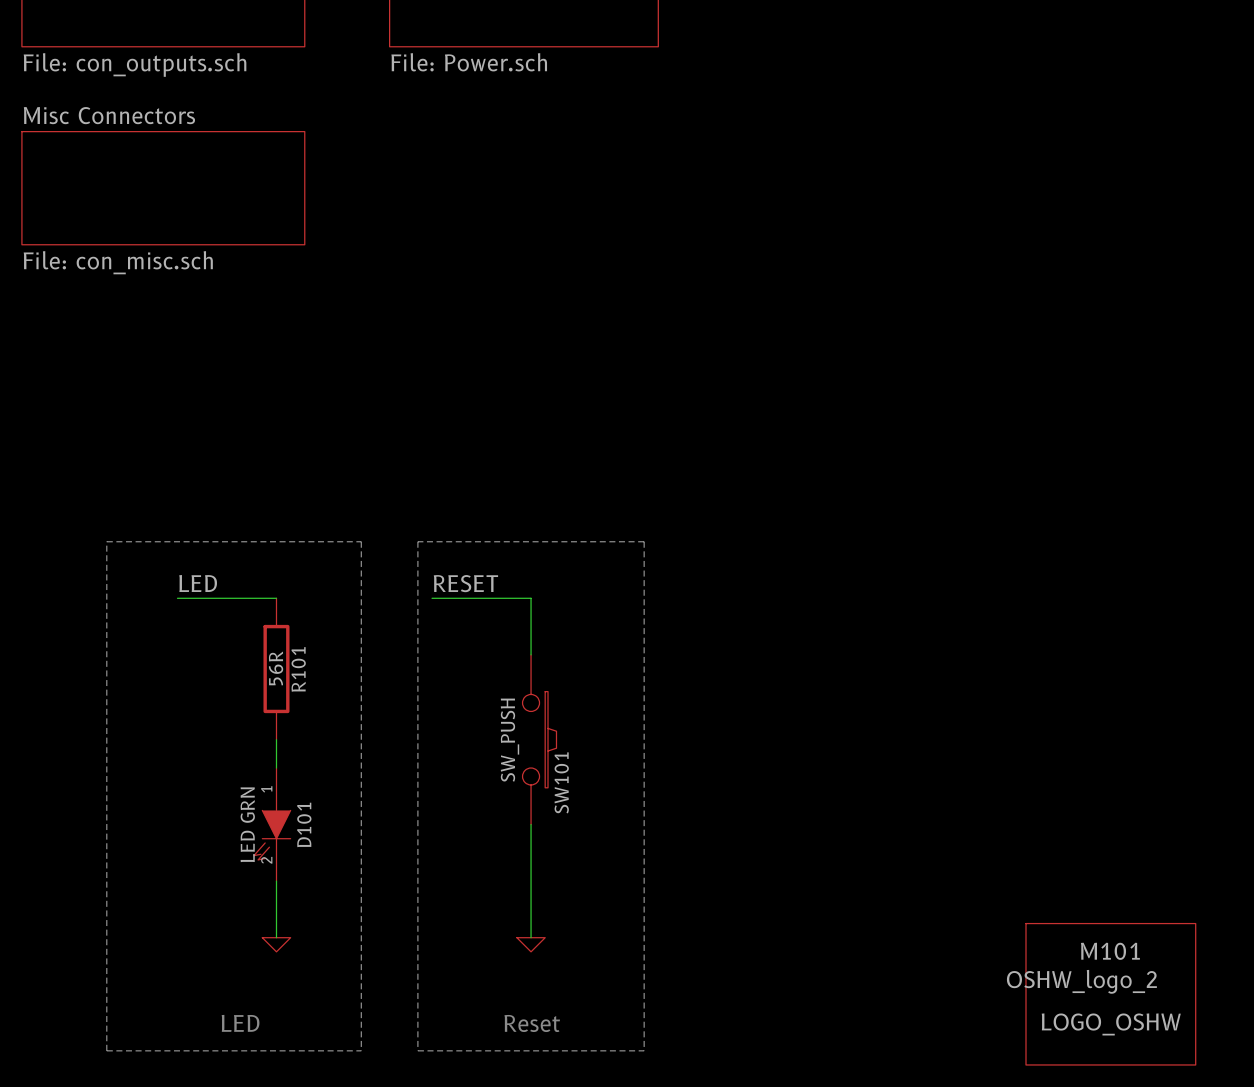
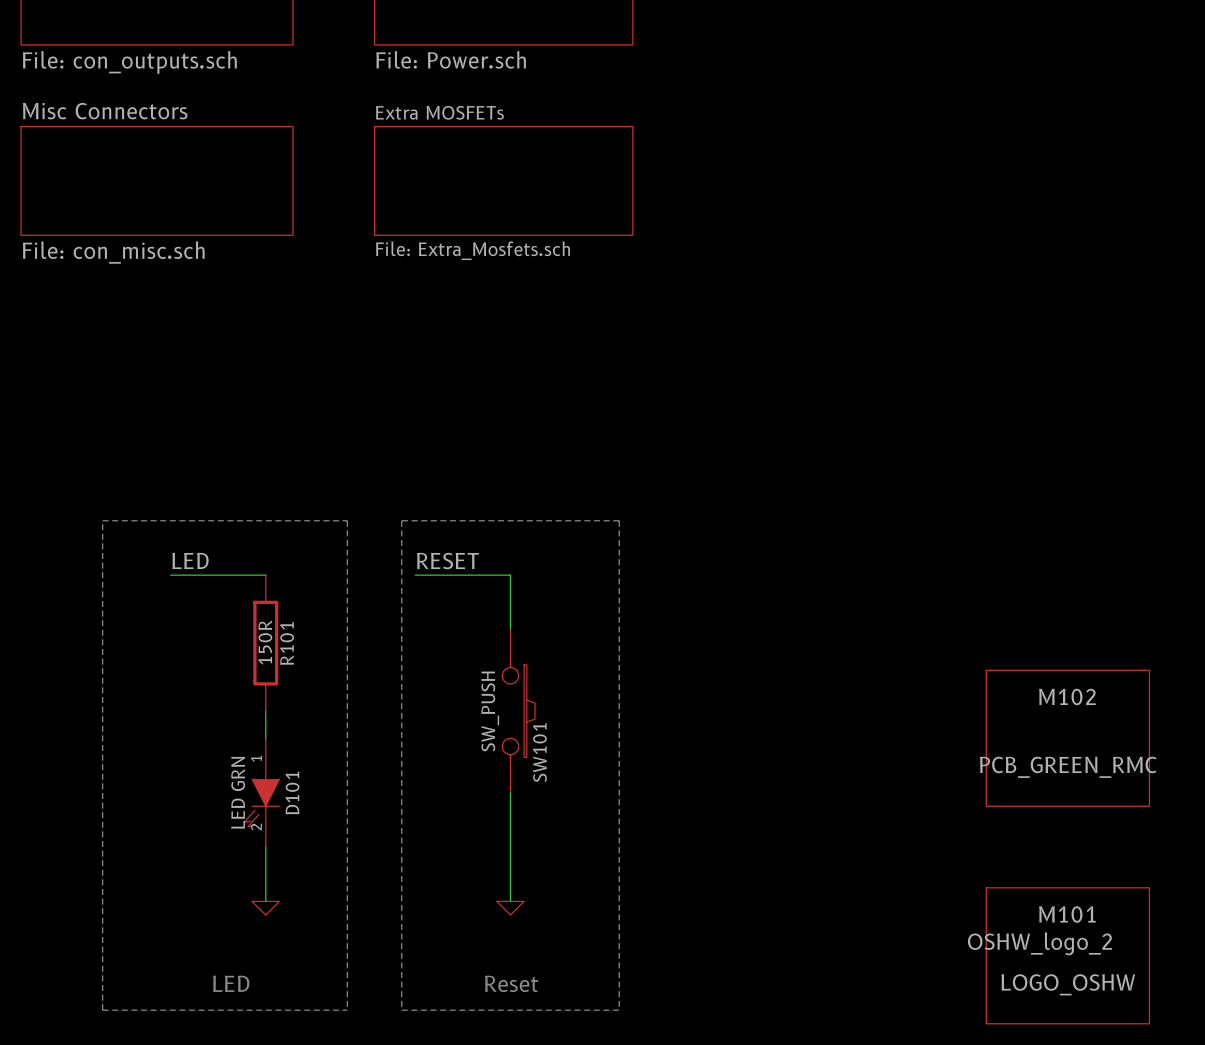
sheet Extra MOSFETs: none -> File: Extra_Mosfets.sch (503, 180)
R101 value: 56R (276, 668) -> 150R (265, 642)
M102: none -> PCB_GREEN_RMC (1067, 738)

